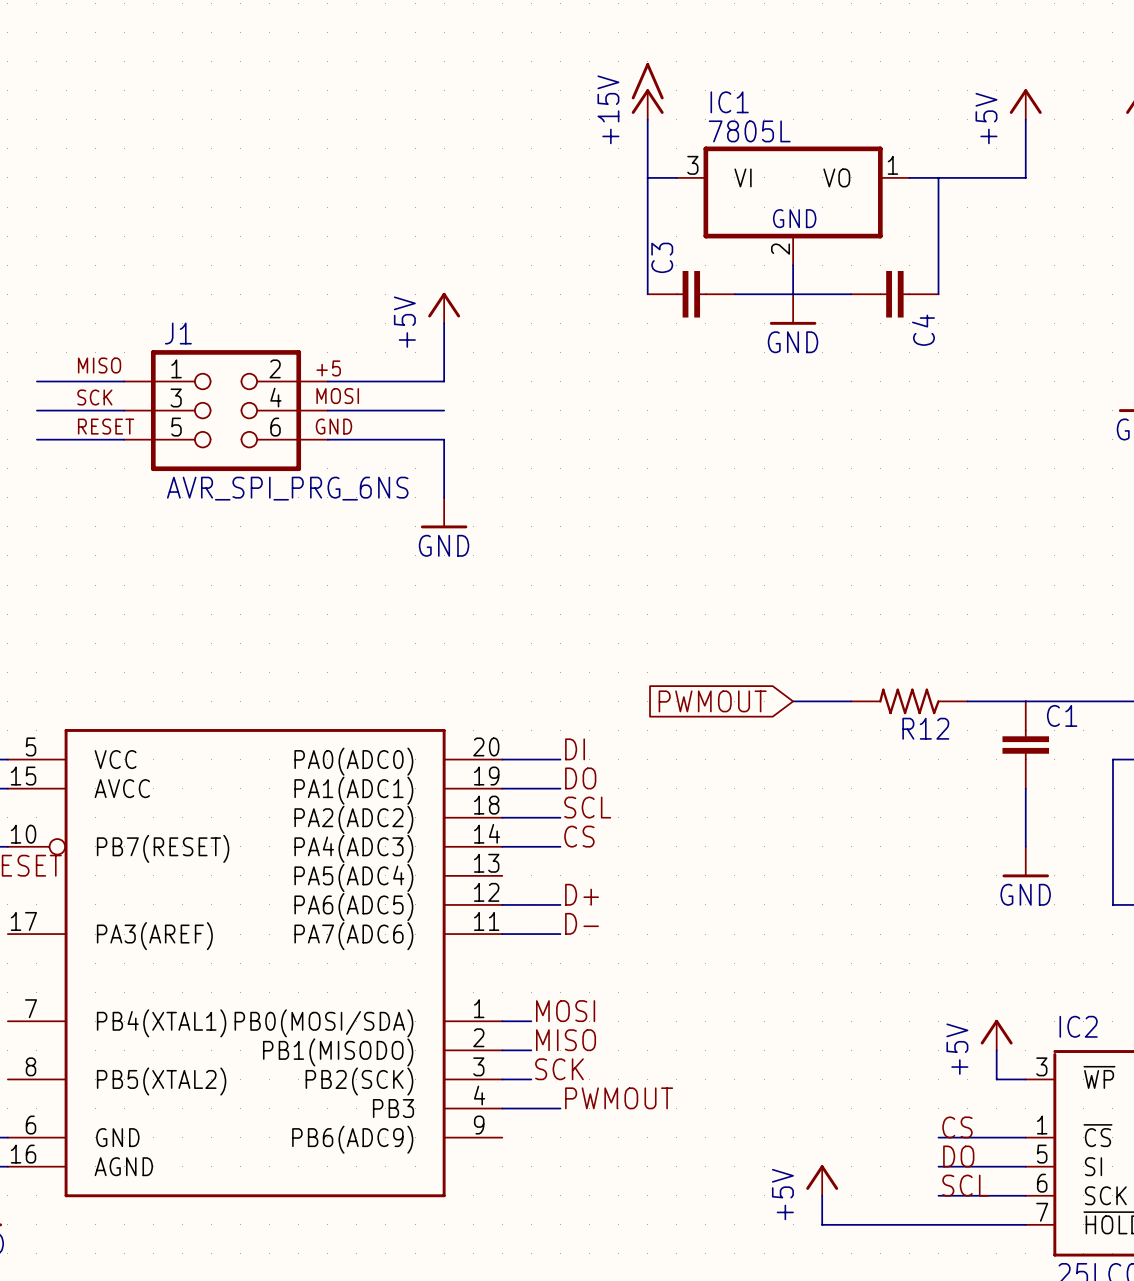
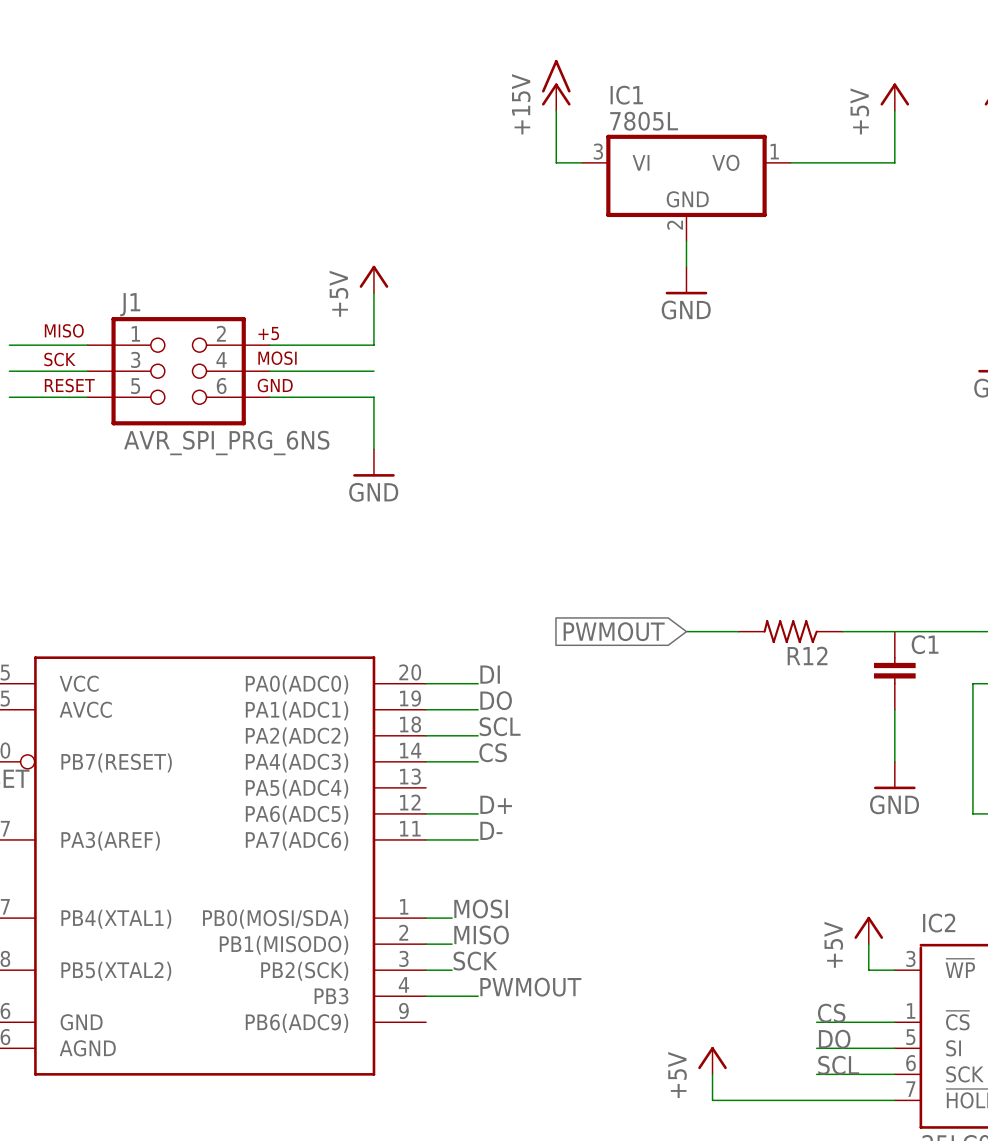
wire: (647, 177) (647, 294) -> none
wire: (938, 177) (938, 294) -> none
C3: (691, 294) -> none
wire: (734, 294) (851, 294) -> none
C4: (894, 294) -> none

